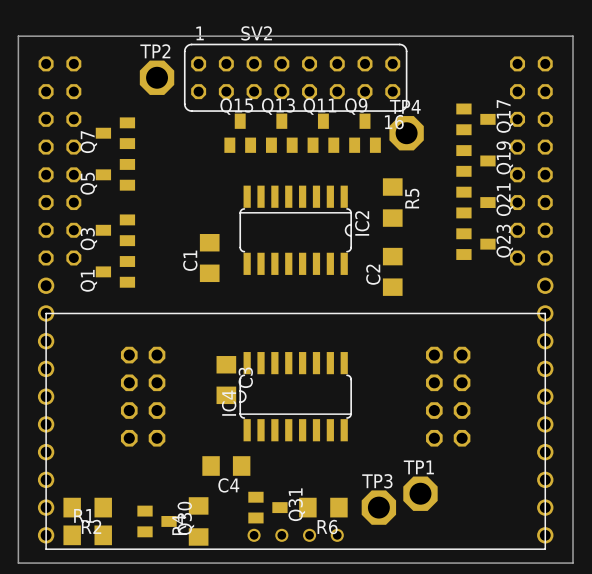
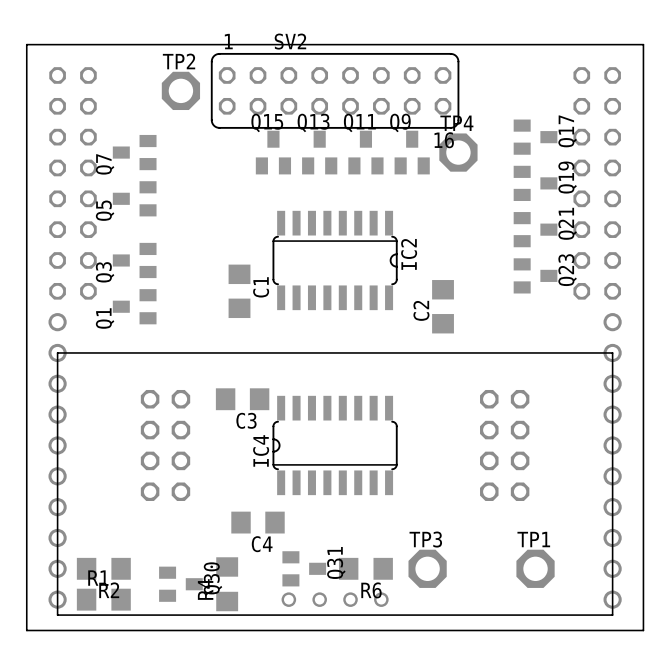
R5: (392, 202) -> none
C1 name position: C1 (190, 260) -> C1 (261, 287)
C3 rotation: 0° (226, 380) -> 90° clockwise (242, 399)
TP1 position: (420, 493) -> (535, 568)

